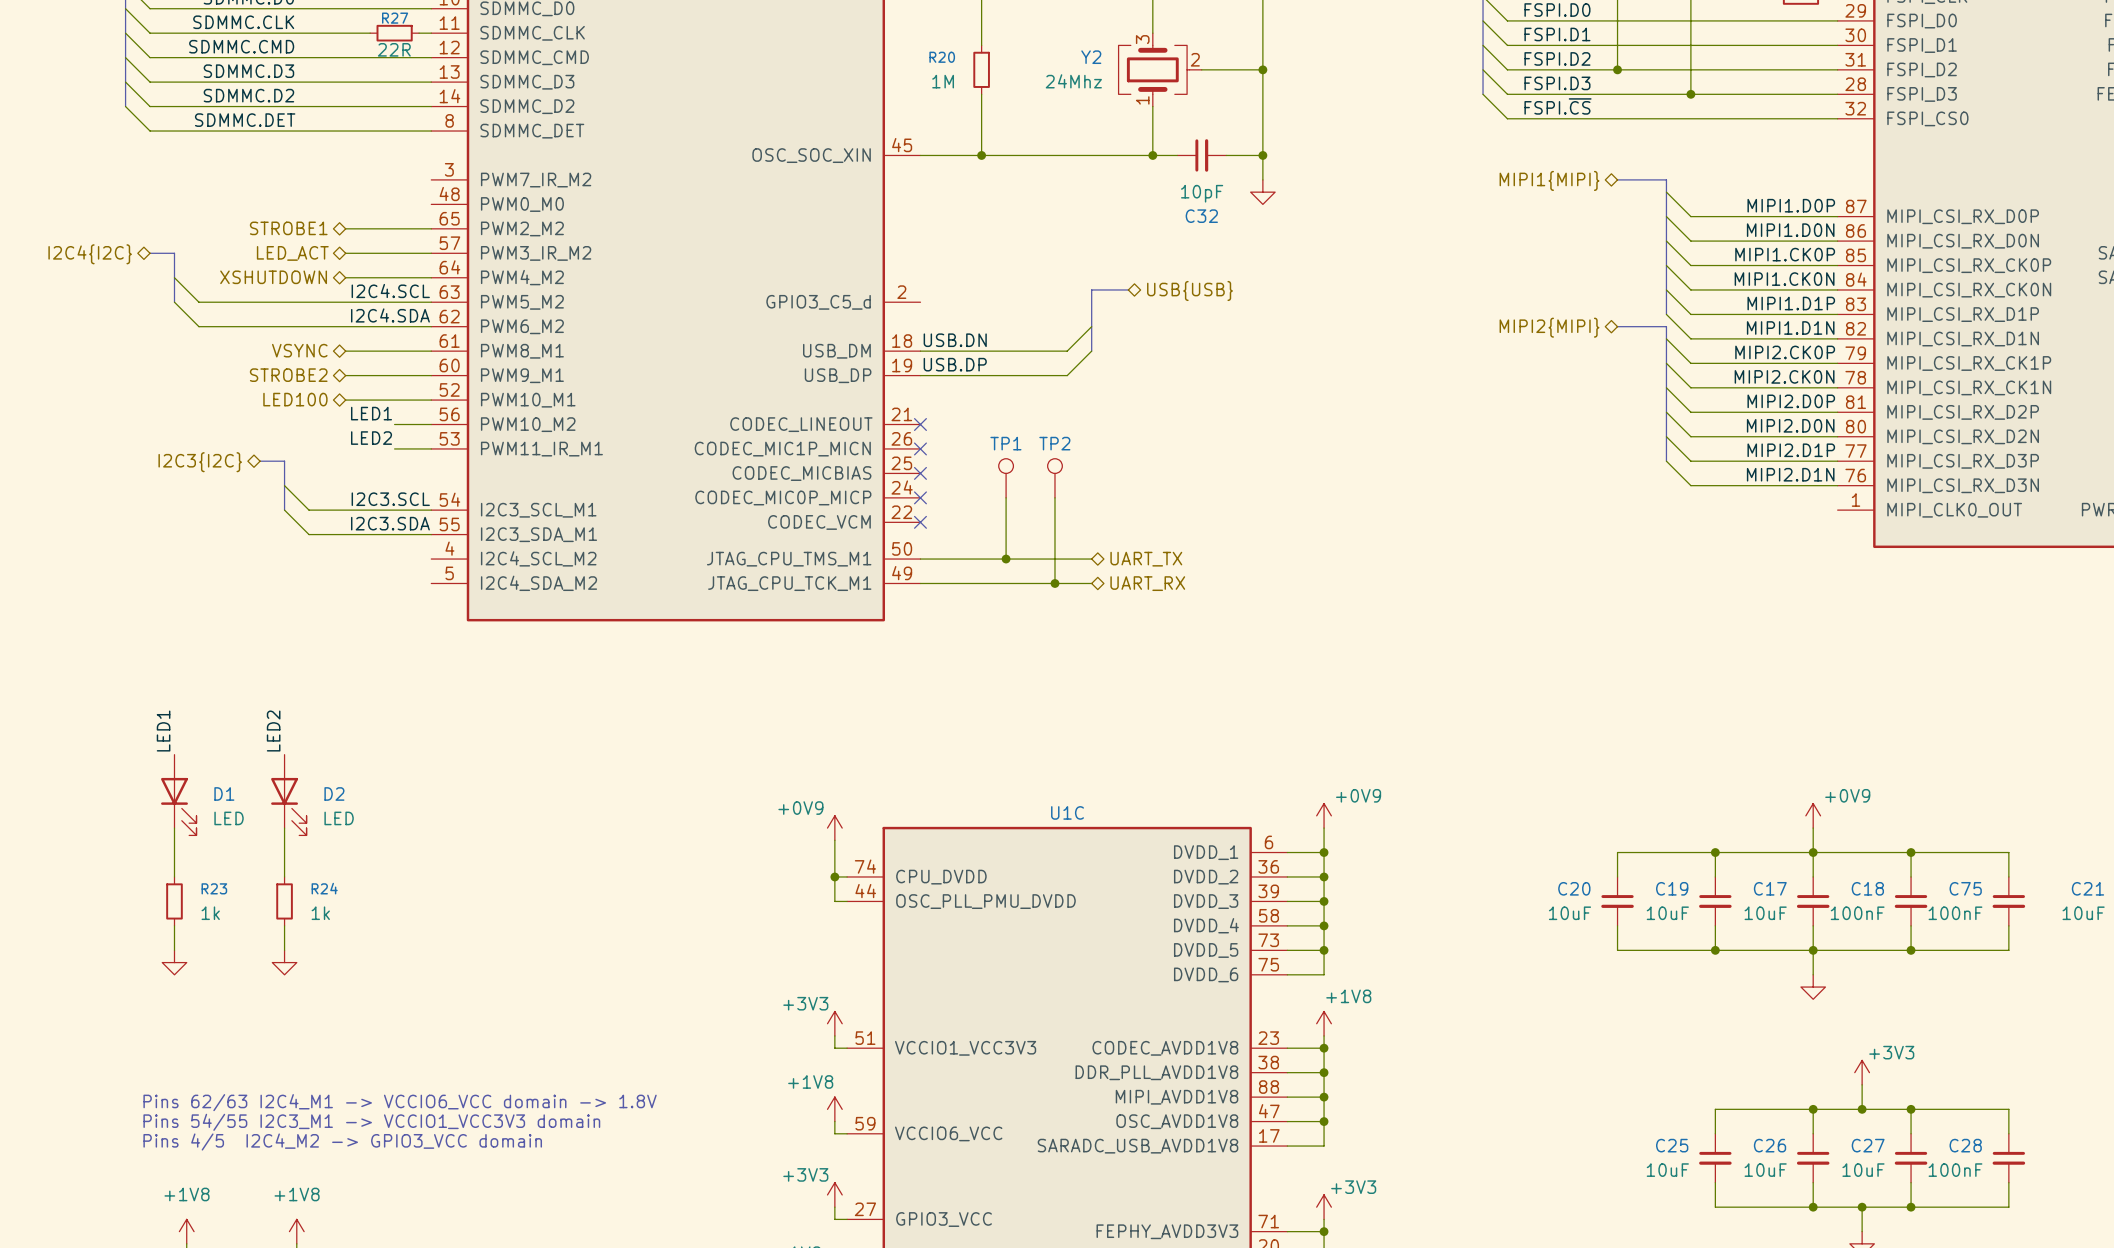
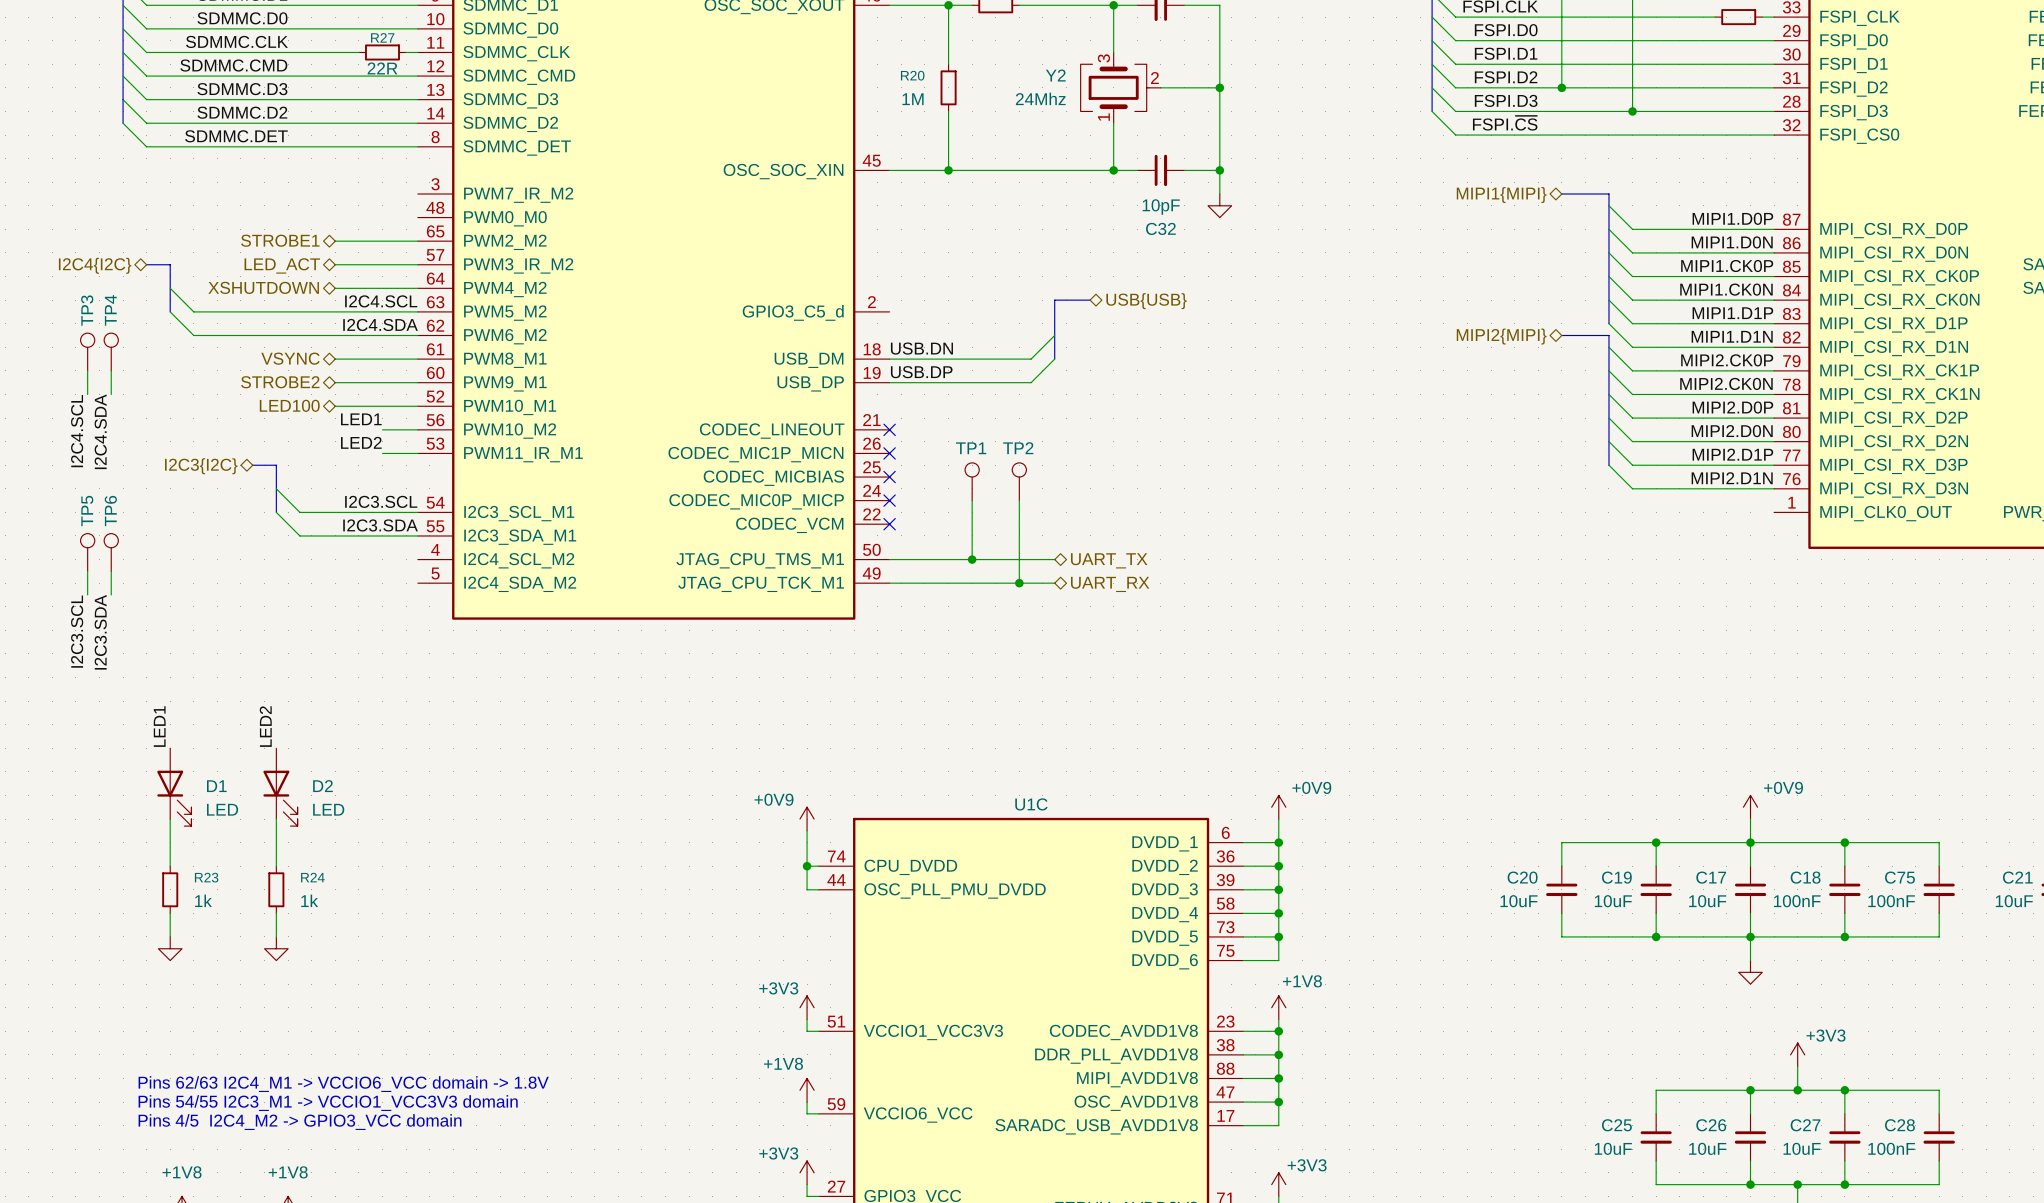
TP3: none -> (87, 352)
TP4: none -> (111, 352)
wire: none -> (87, 370) (87, 394)
wire: none -> (111, 370) (111, 394)
label: none -> I2C4.SCL (77, 431)
label: none -> I2C4.SDA (100, 431)
TP5: none -> (87, 552)
TP6: none -> (111, 552)
wire: none -> (87, 571) (87, 594)
wire: none -> (111, 571) (111, 594)
label: none -> I2C3.SCL (77, 631)
label: none -> I2C3.SDA (100, 632)

